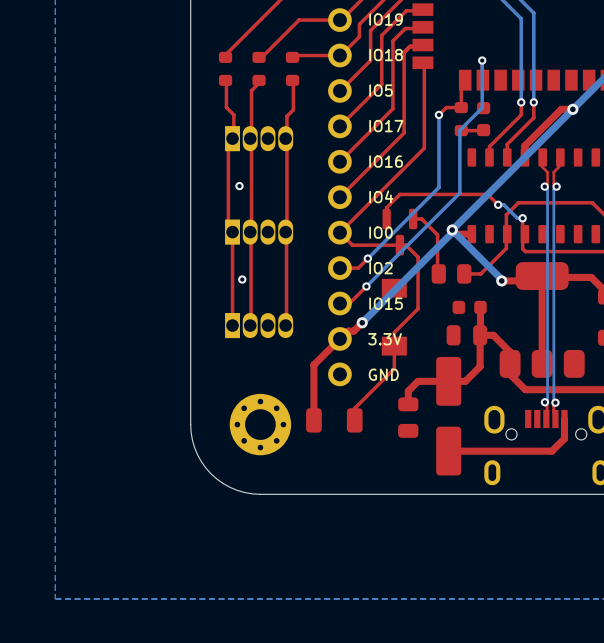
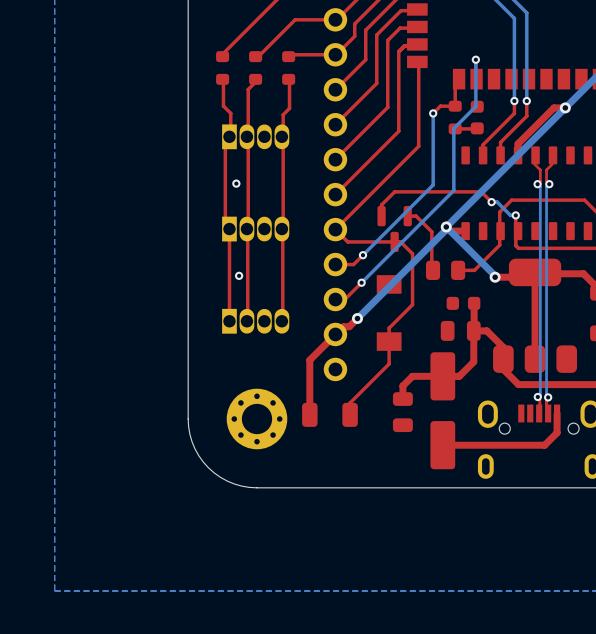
text: IO19 (386, 19) -> none
text: IO18 (386, 55) -> none
text: IO5 (381, 90) -> none
text: IO17 (386, 126) -> none
text: IO16 (386, 161) -> none
text: IO4 (381, 196) -> none
text: IO0 (381, 232) -> none
text: IO2 (381, 268) -> none
text: IO15 (386, 303) -> none
text: 3.3V (385, 339) -> none
text: GND (383, 374) -> none

